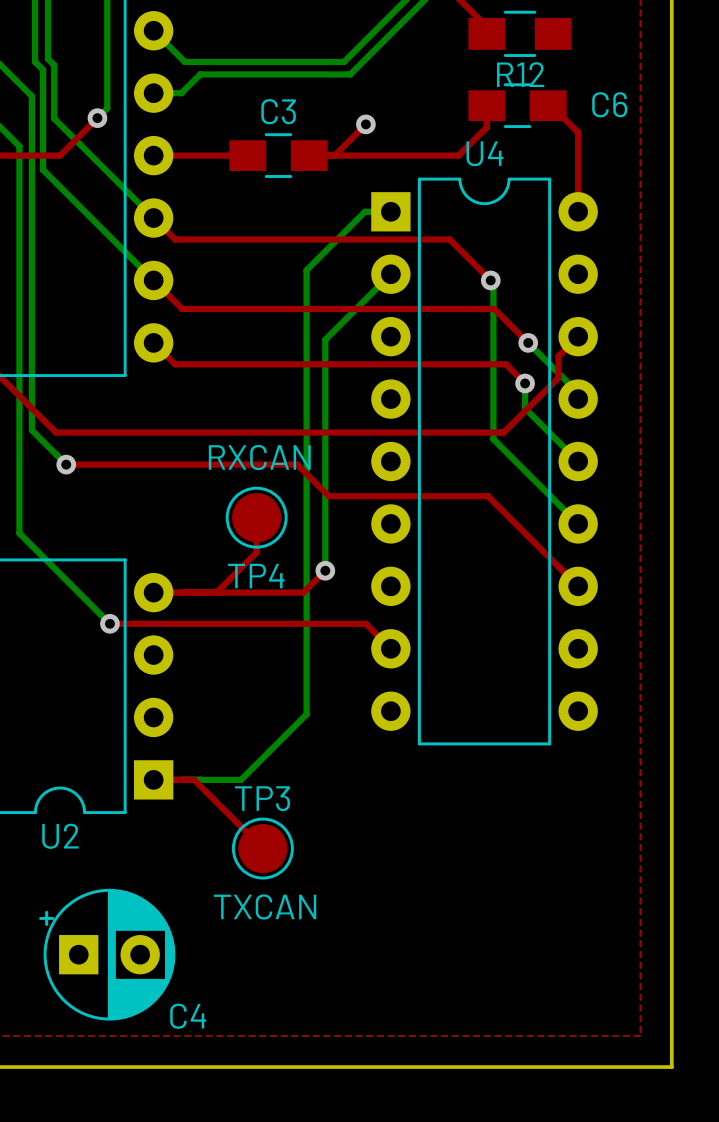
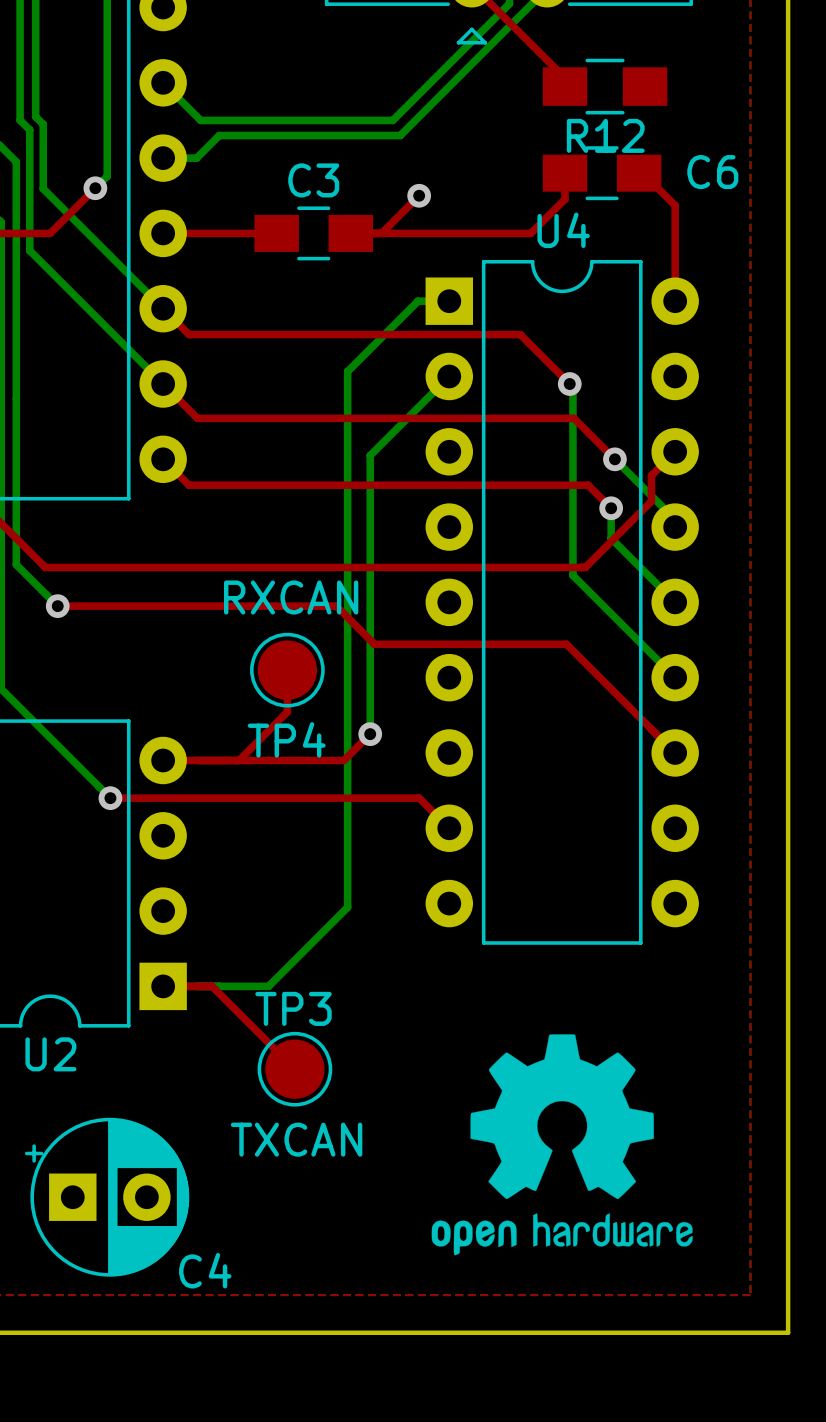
drawing: none -> [431, 1034, 693, 1256]

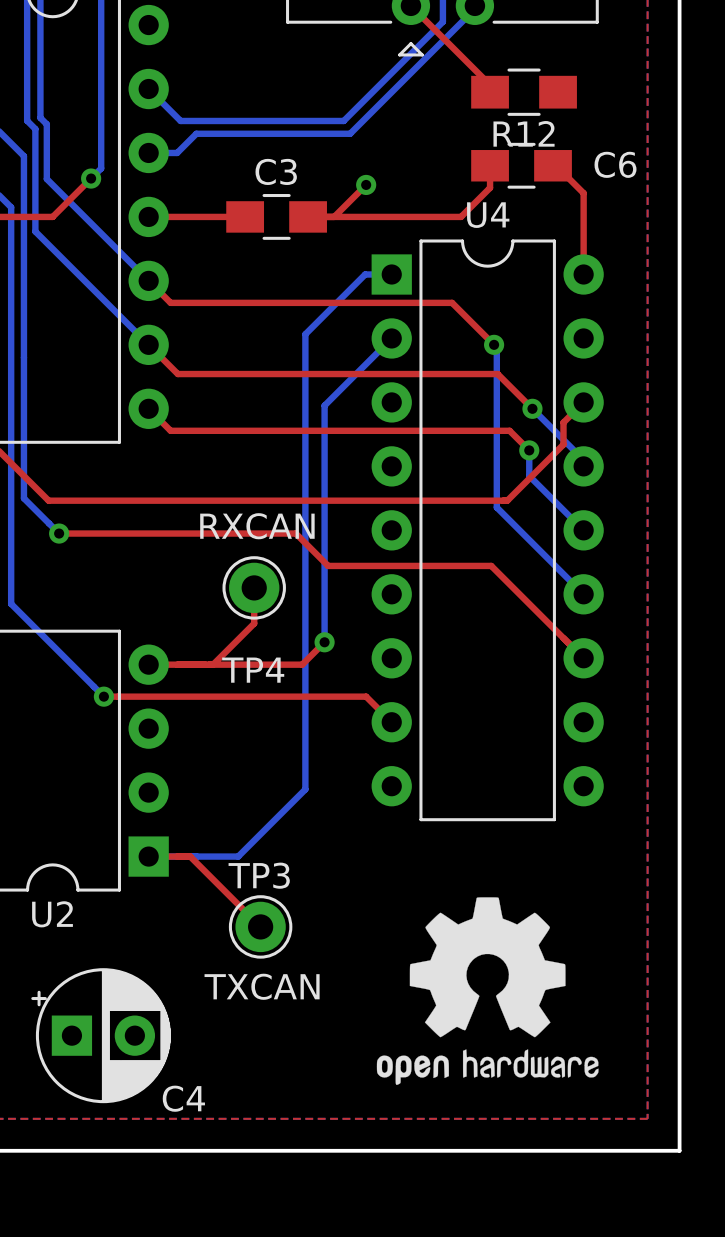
TP4 footprint: [250, 632, 325, 708] -> [222, 556, 286, 620]
TP3 footprint: [257, 1031, 333, 1107] -> [228, 895, 293, 959]

